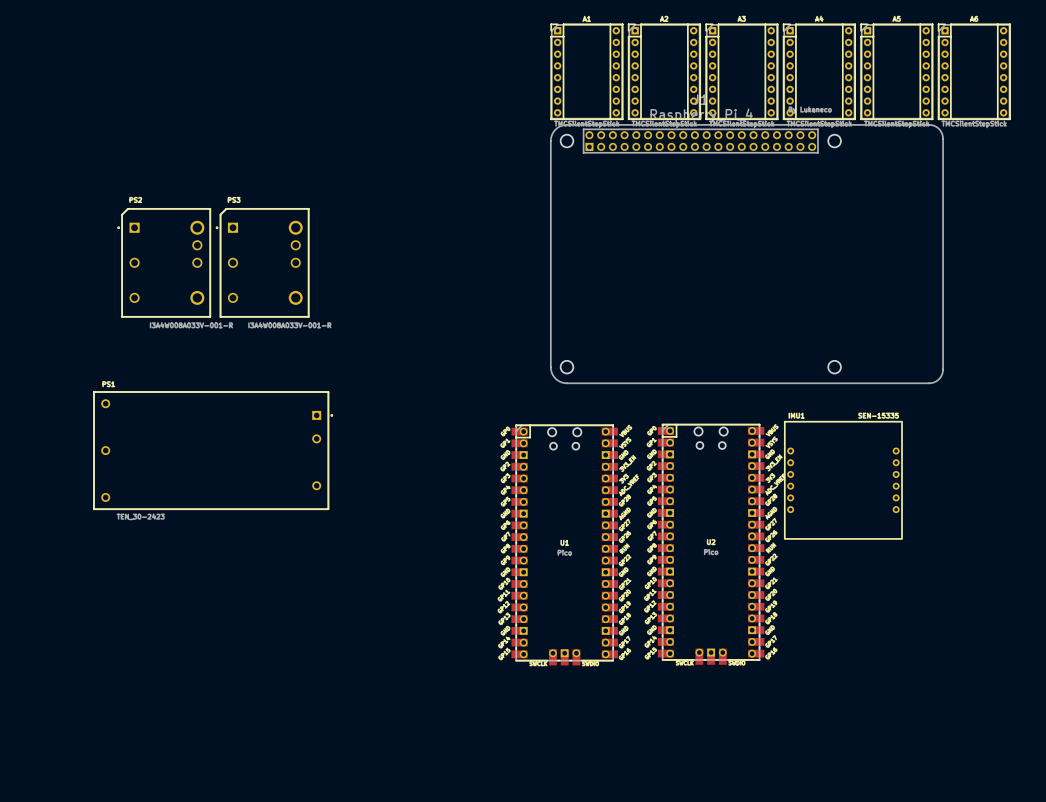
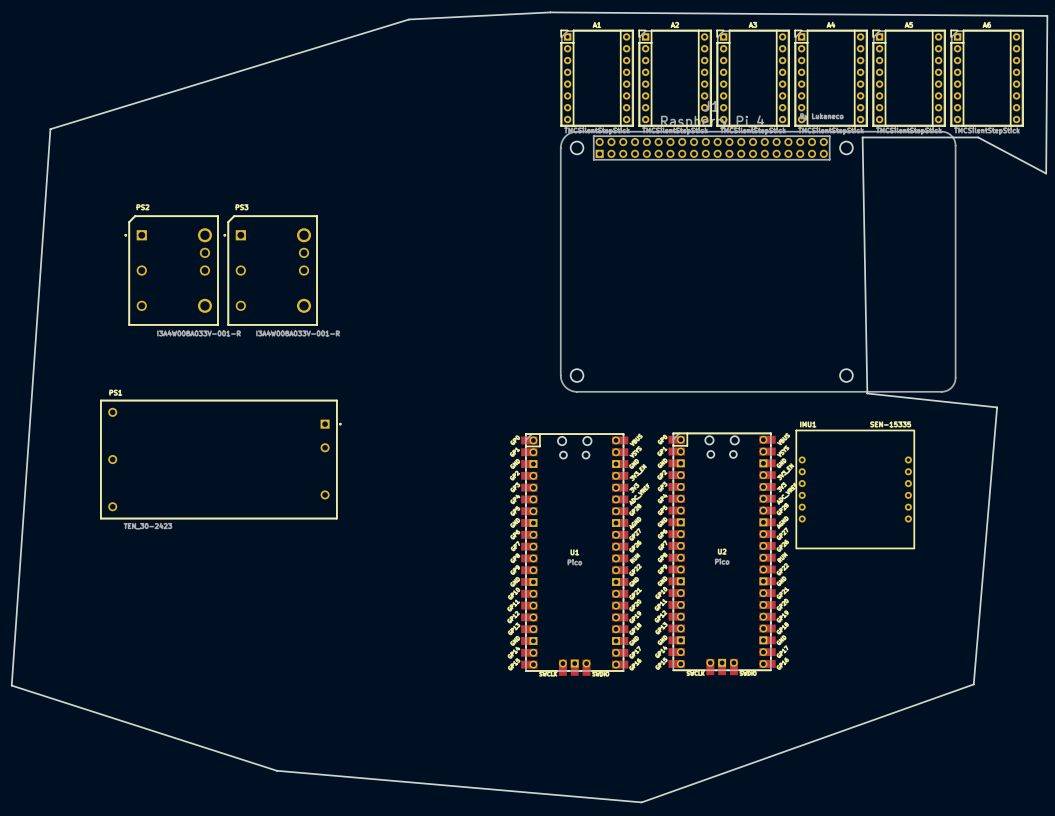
board edge: none -> (550, 12) (1047, 15) (1046, 173) (978, 137) (862, 137) (867, 393) (997, 407) (973, 684) (641, 802) (276, 770) (11, 685) (50, 129) (409, 19) (550, 12)

